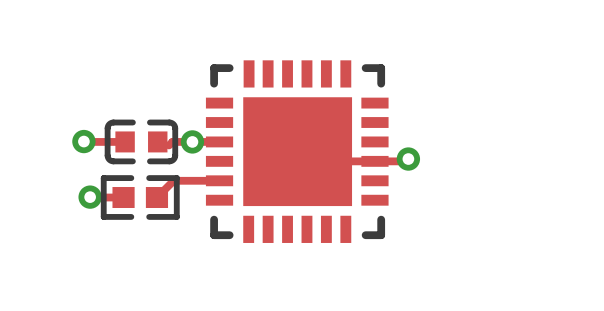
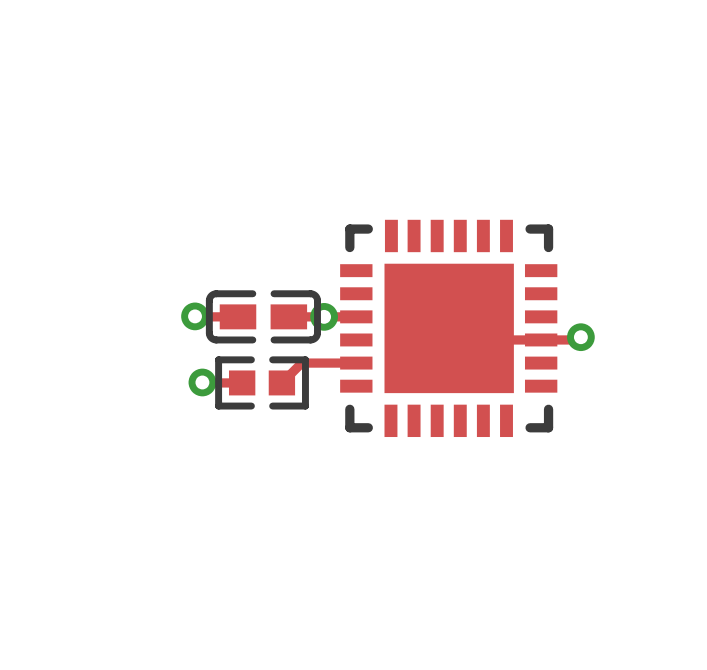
part footprint: [104, 119, 179, 165] -> [205, 290, 321, 344]

